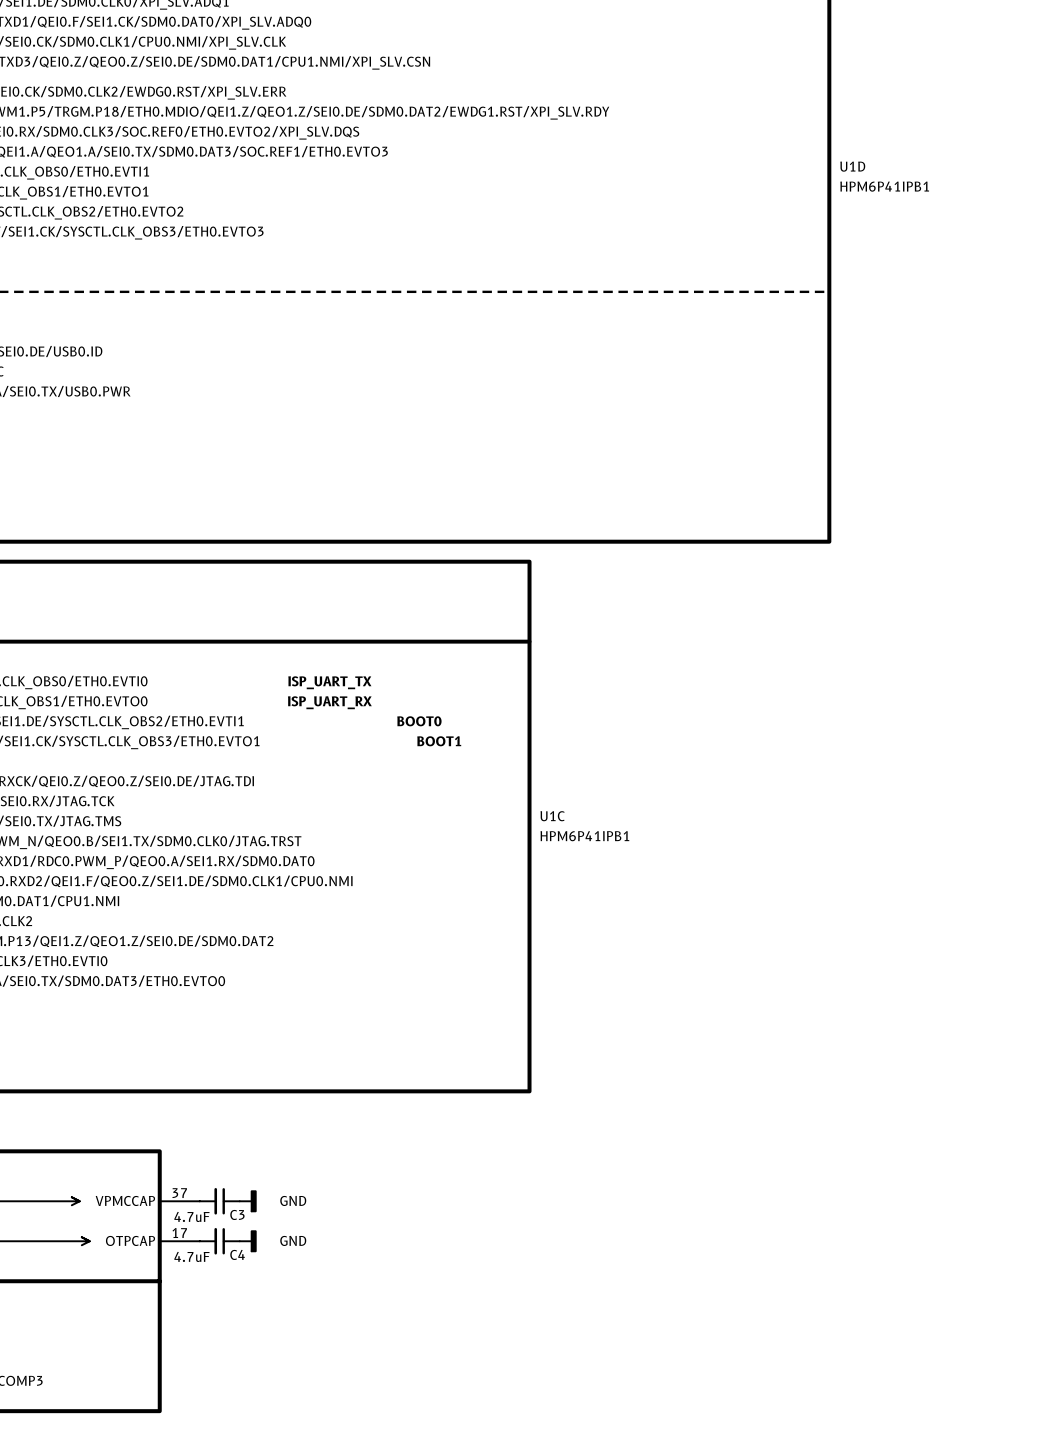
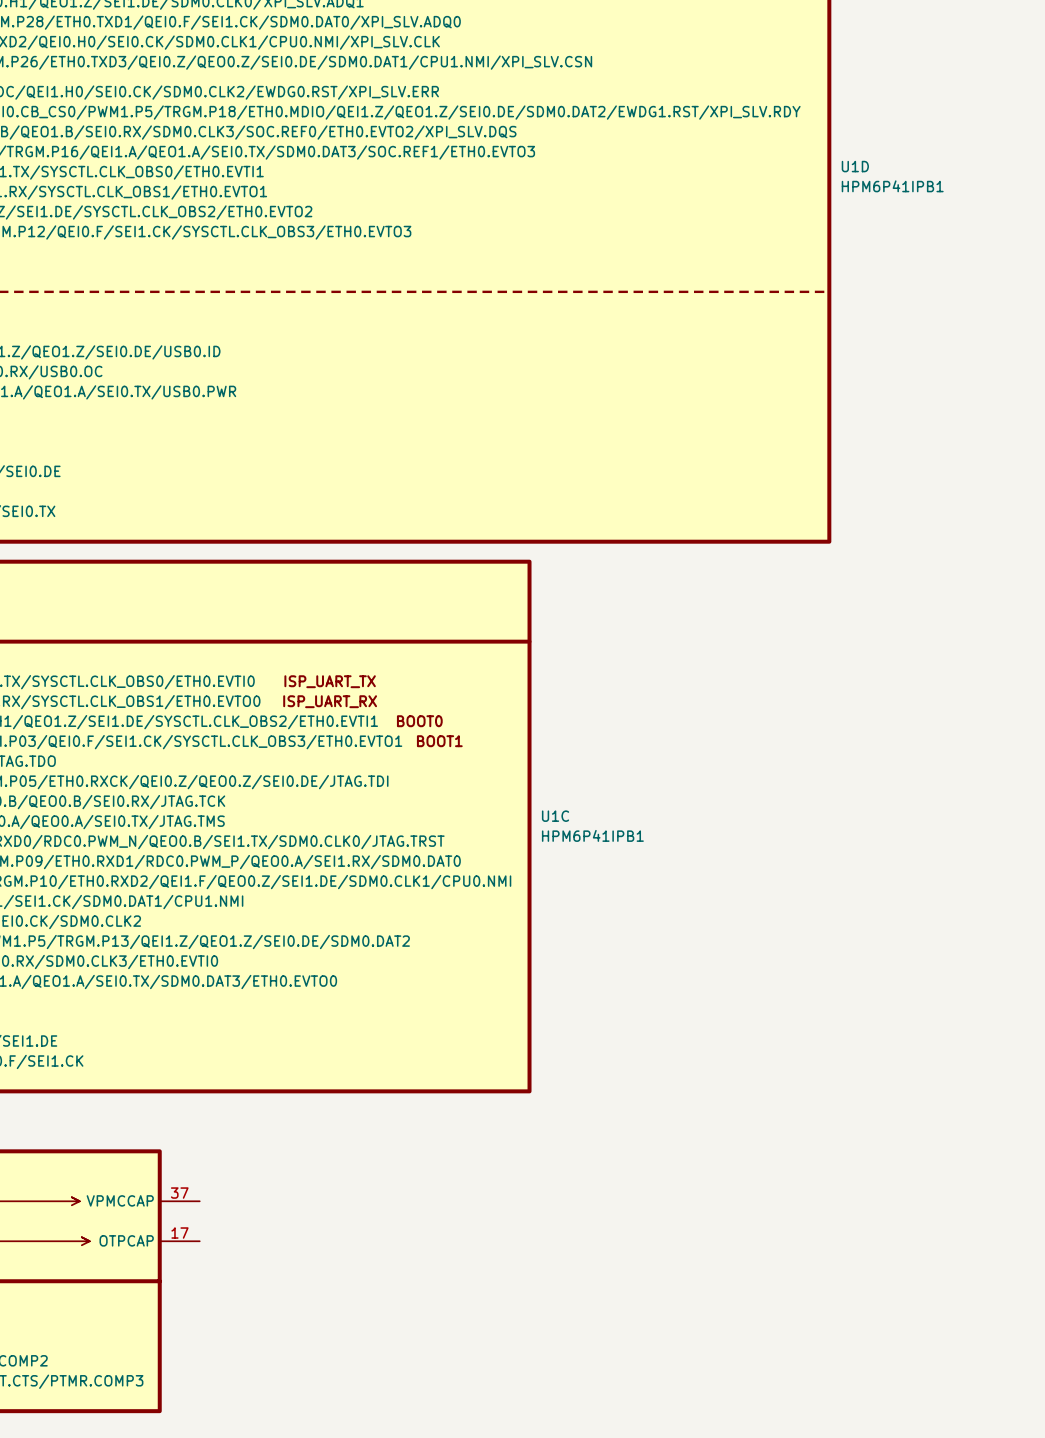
C3: 4.7uF (219, 1201) -> none
power symbol: GND (248, 1201) -> none
C4: 4.7uF (219, 1241) -> none
power symbol: GND (248, 1241) -> none

